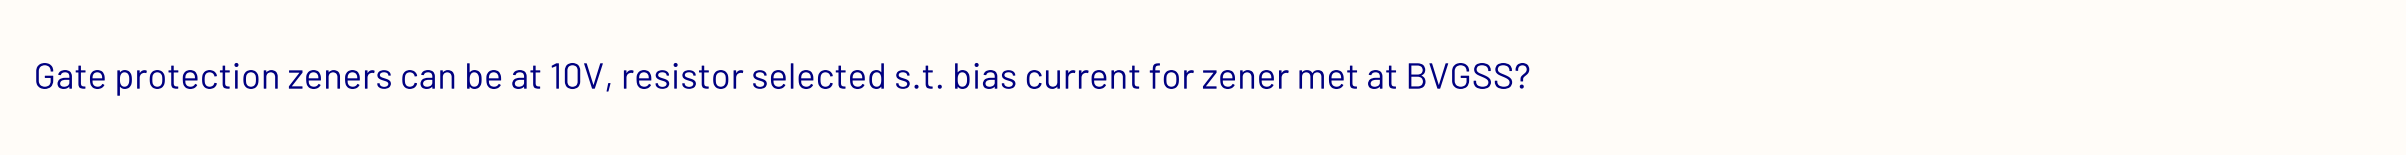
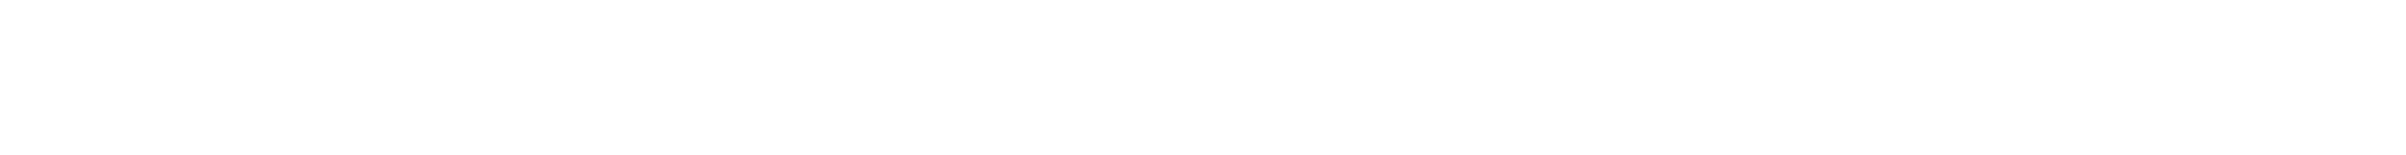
text: Gate protection zeners can be at 10V, resistor selected s.t. bias current for zener met at BVGSS? (782, 79) -> none

